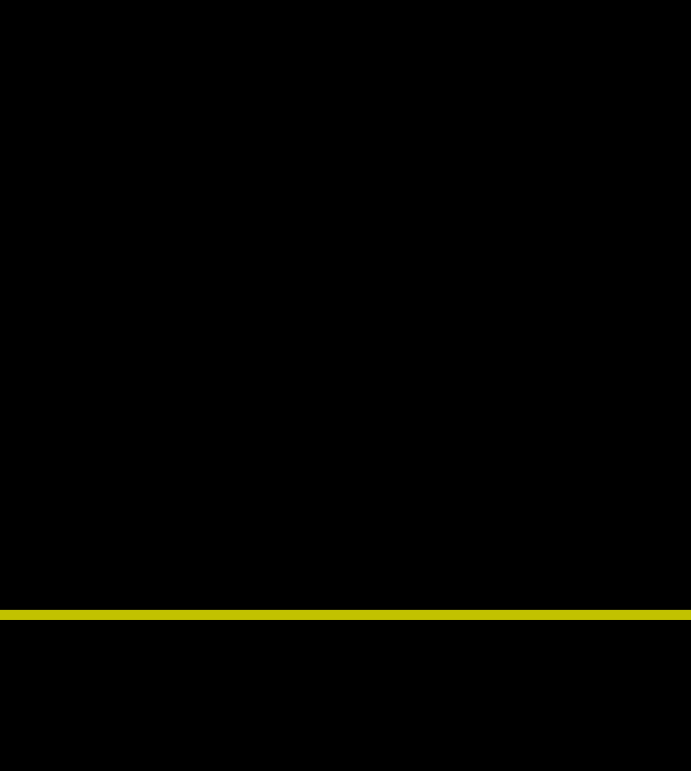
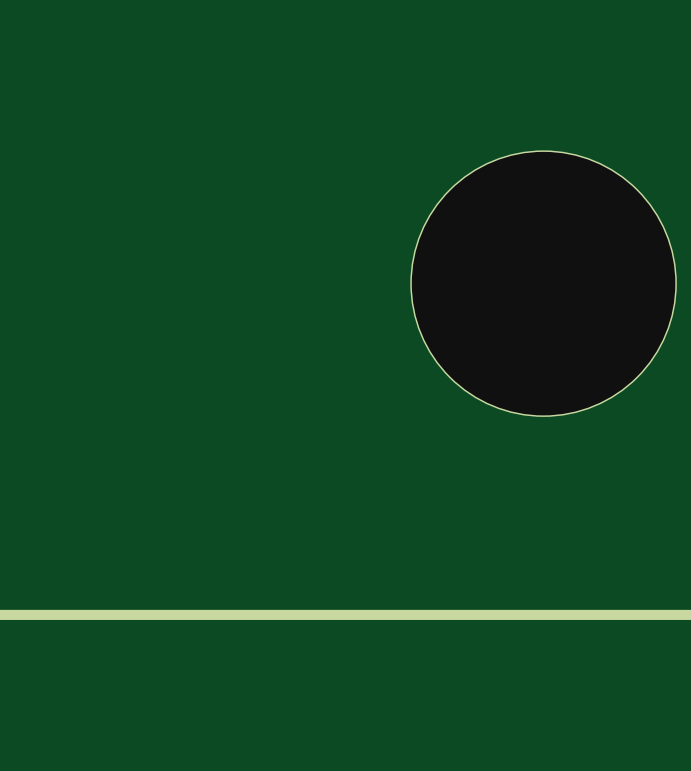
hole: none -> (543, 283)

